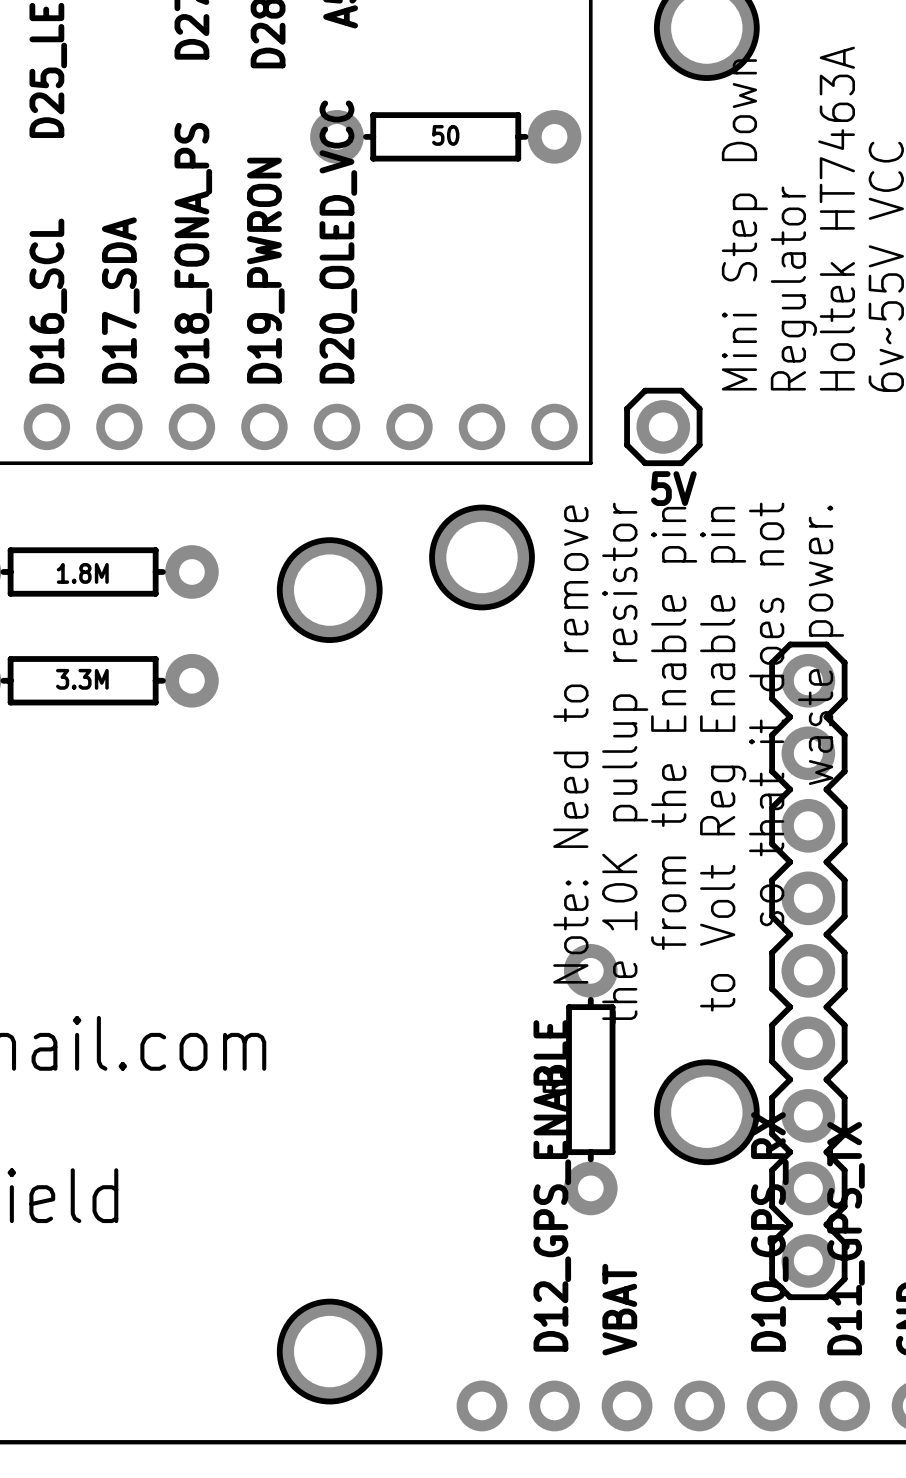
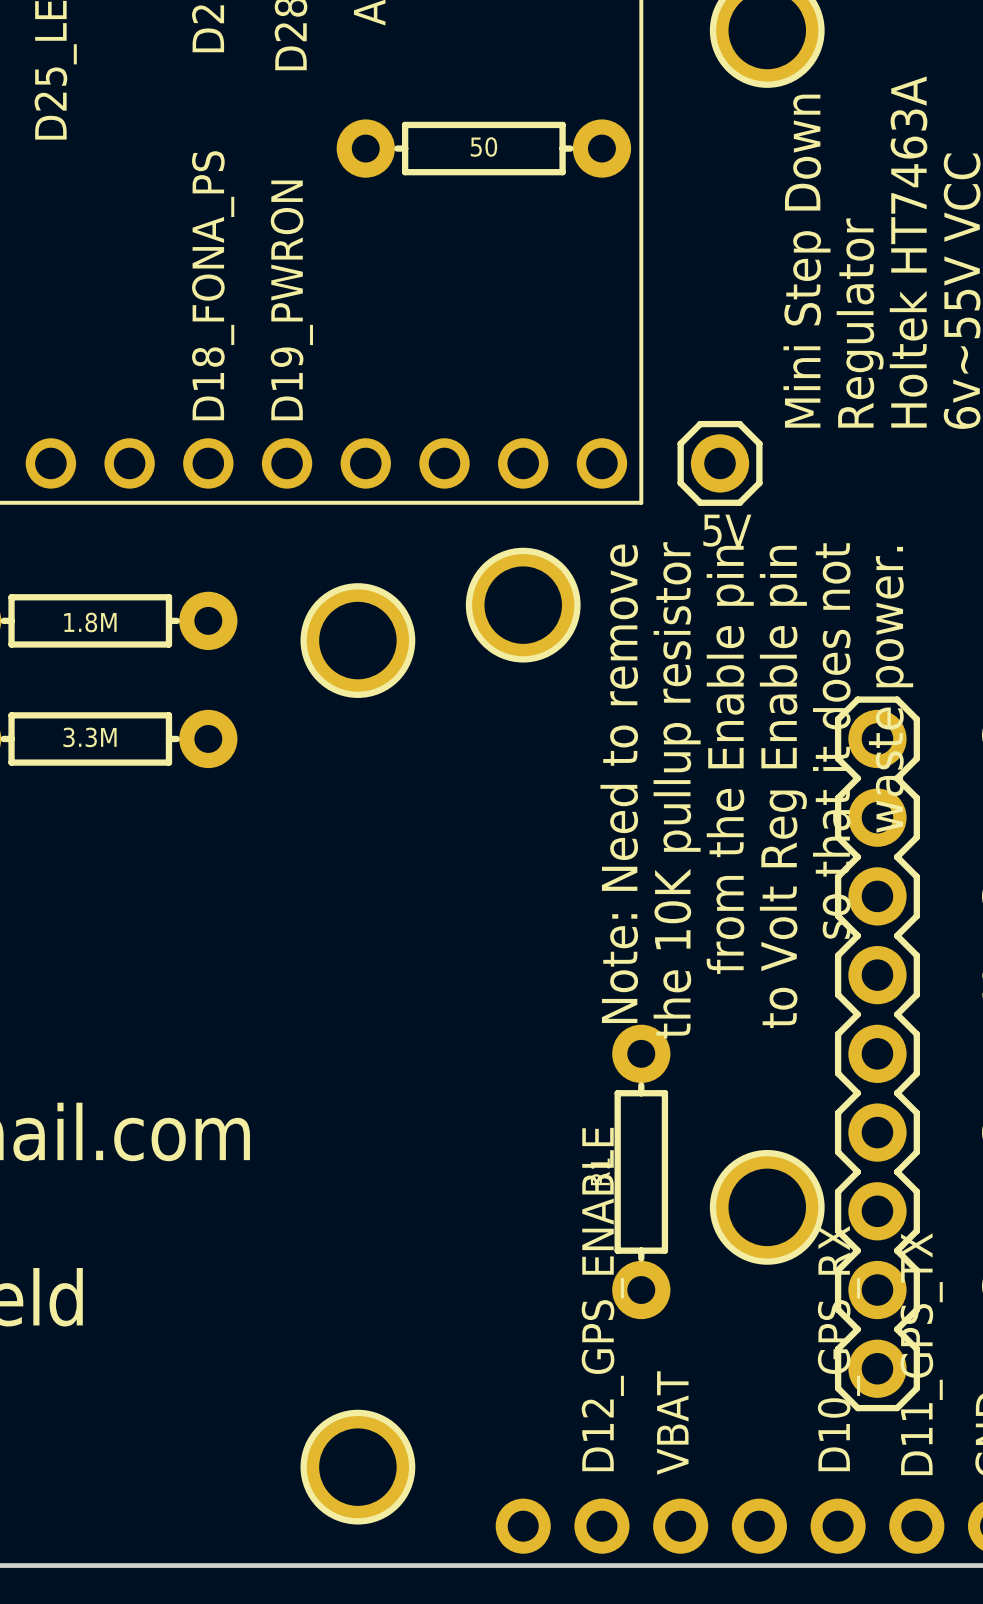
text: D20_OLED_VCC (338, 242) -> none
text: D17_SDA (120, 300) -> none
text: D16_SCL (48, 301) -> none

